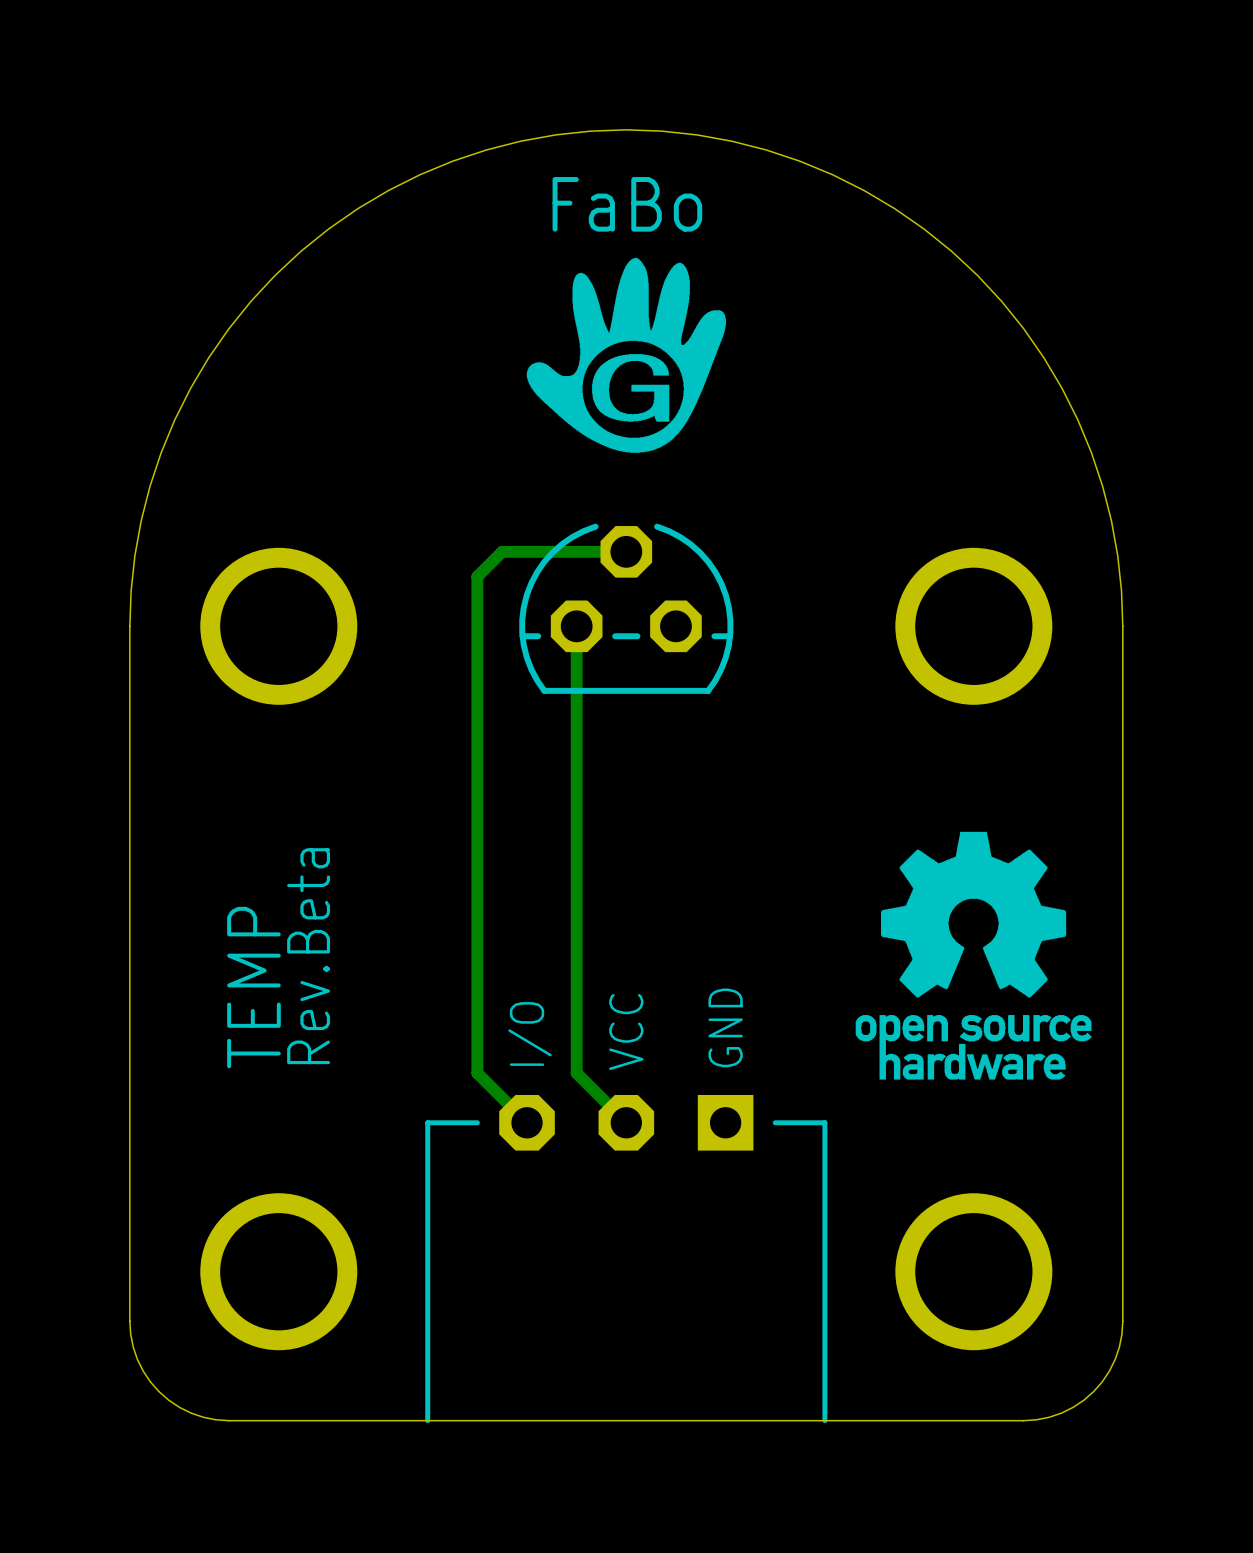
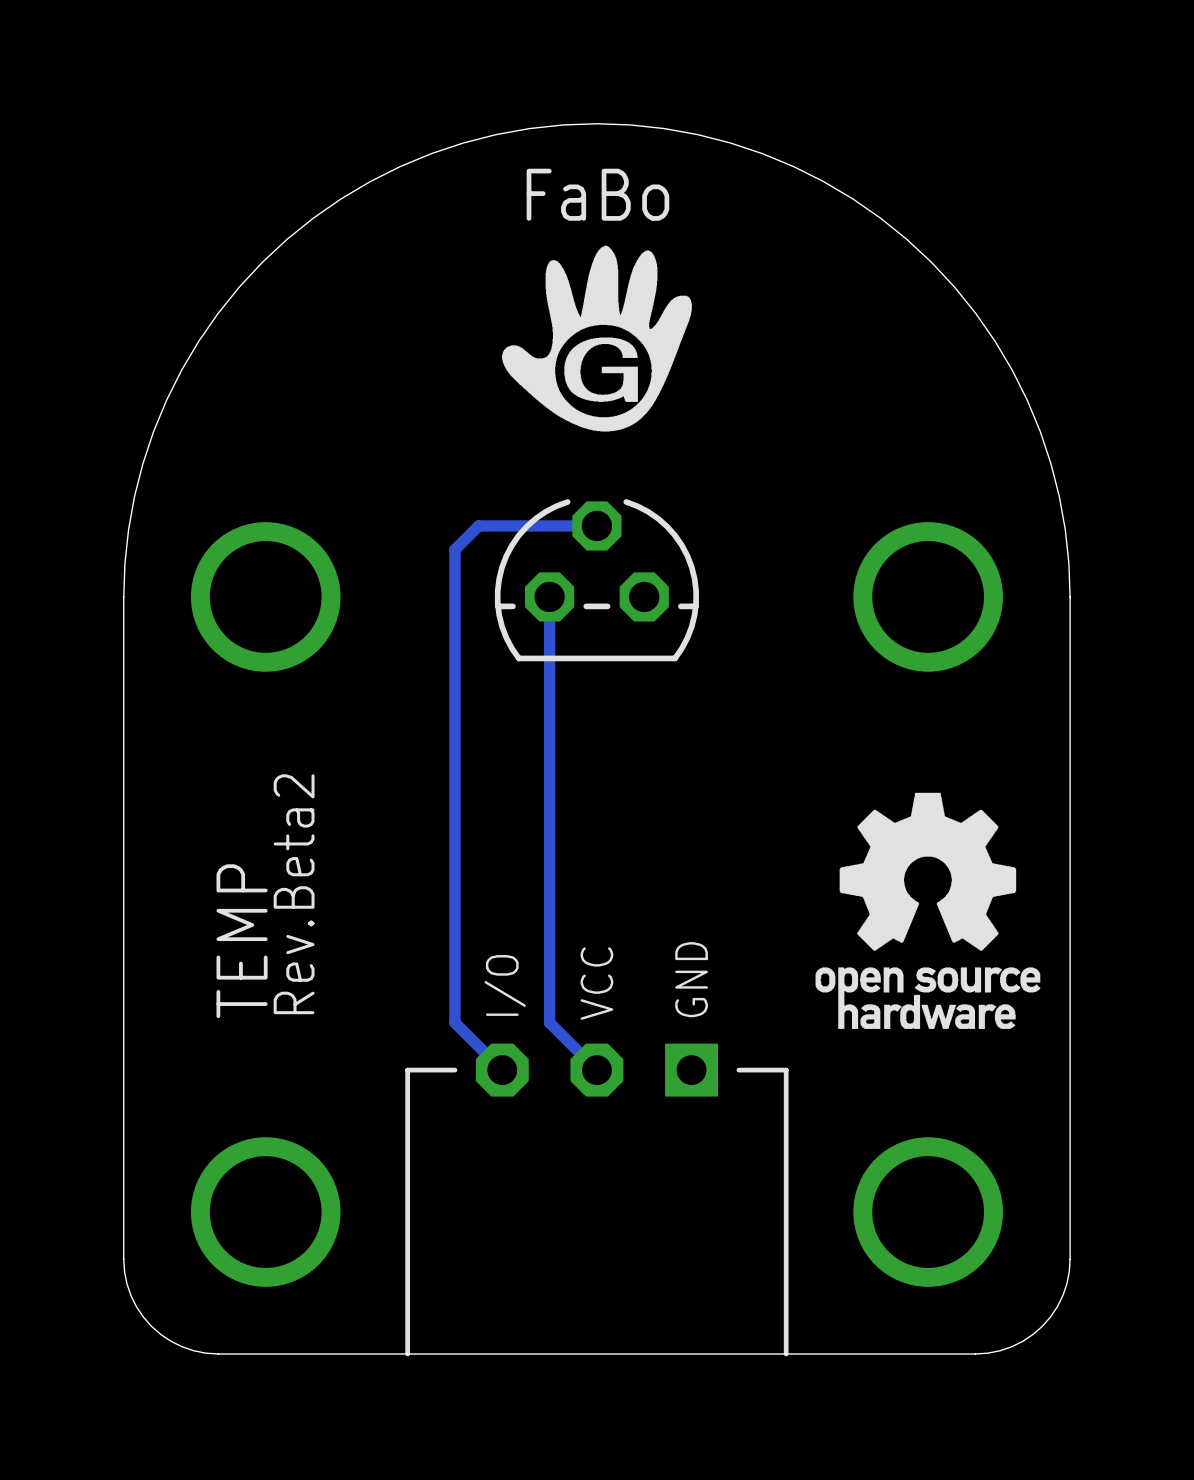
text: Rev.Beta (308, 956) -> Rev.Beta2 (294, 894)

